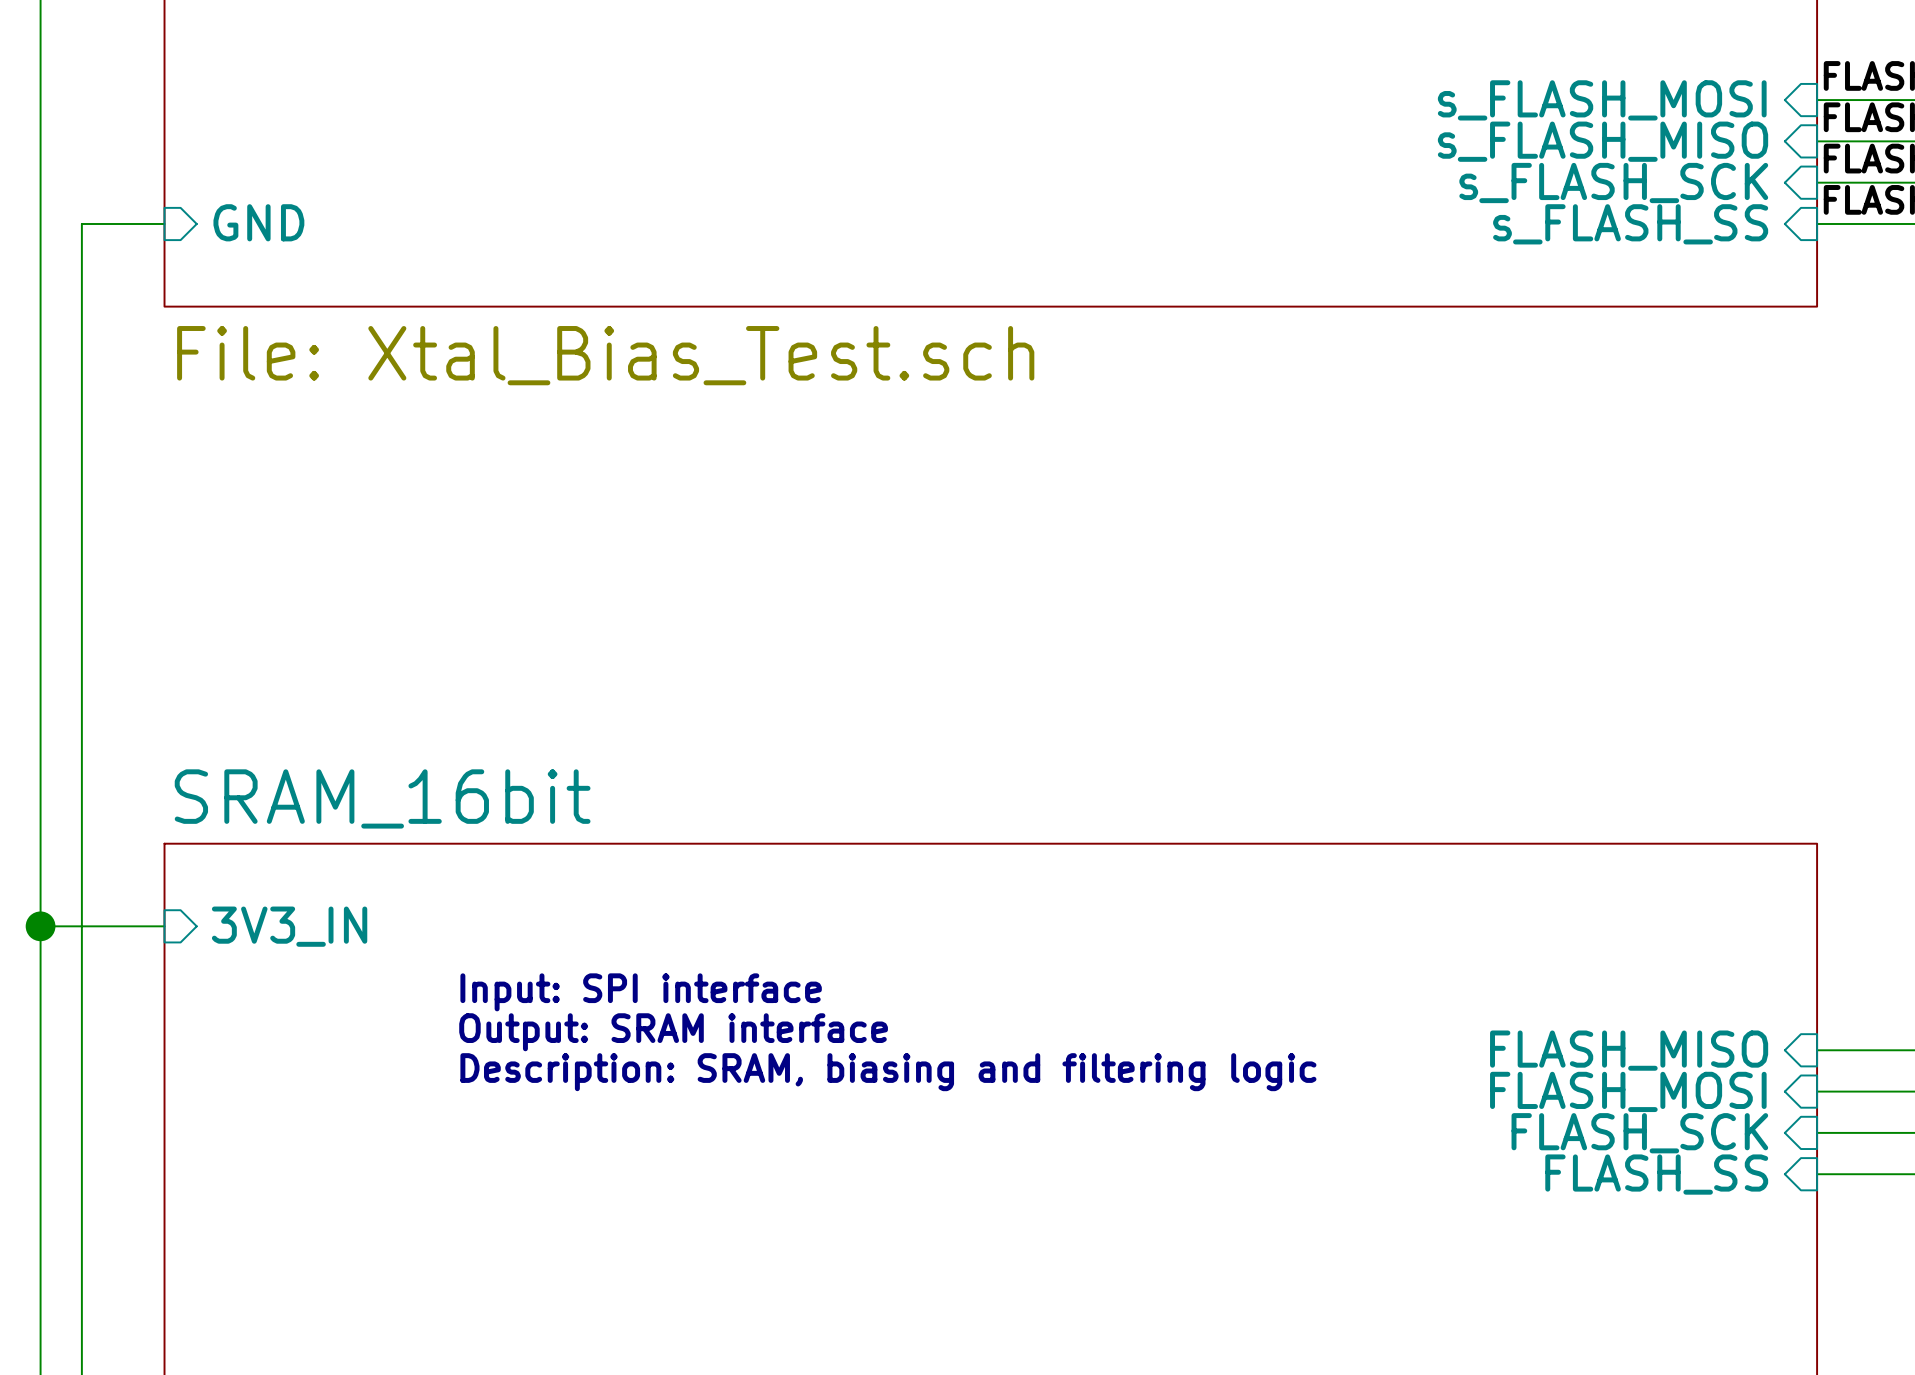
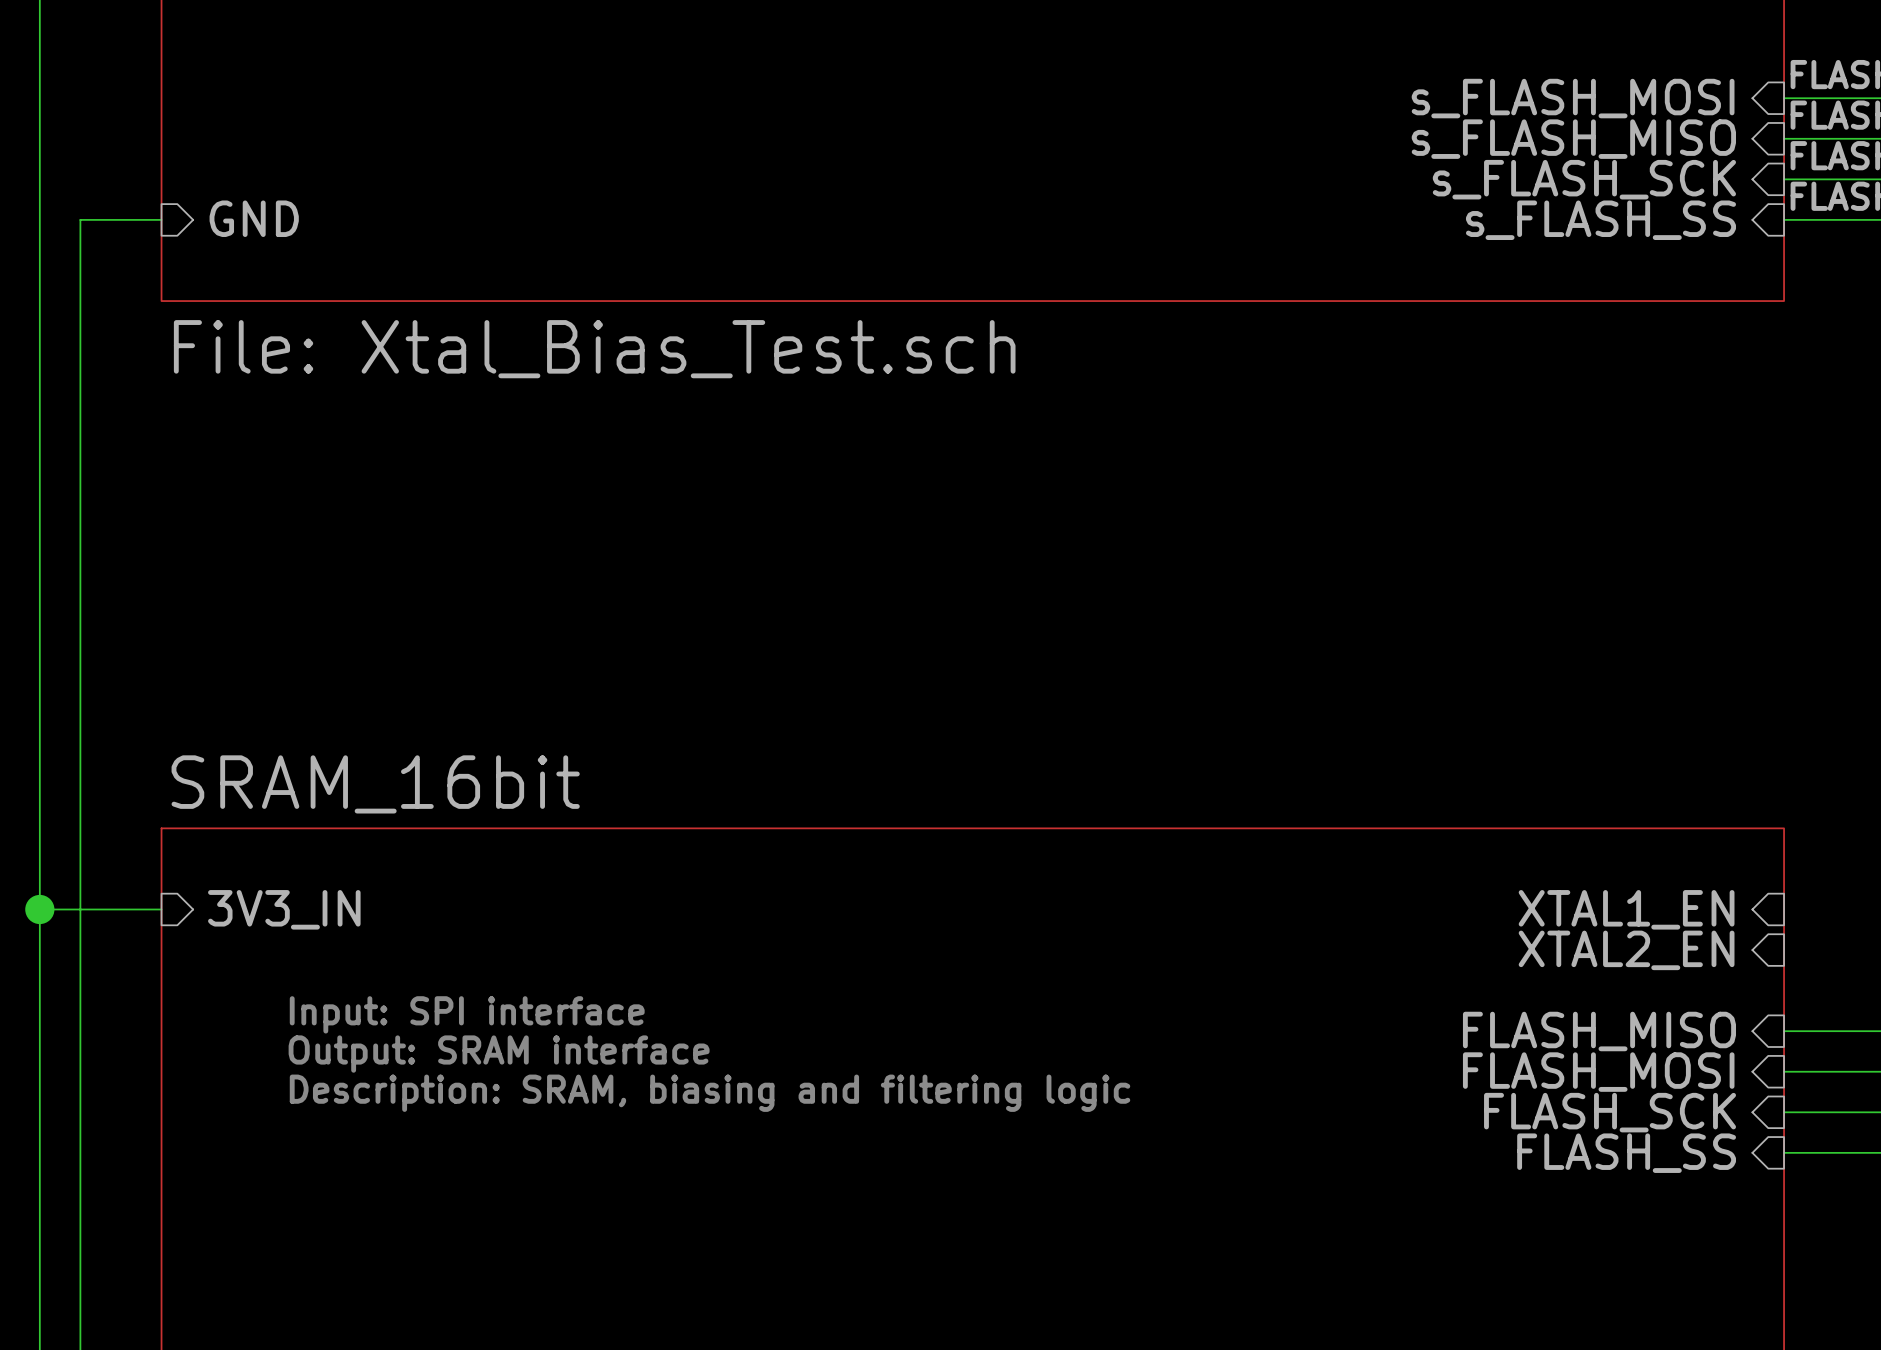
sheet pin: none -> XTAL1_EN (1626, 909)
sheet pin: none -> XTAL2_EN (1626, 950)
text position: Input: SPI interface (641, 992) -> Input: SPI interface (467, 1014)
text position: Output: SRAM interface (673, 1032) -> Output: SRAM interface (499, 1054)
text position: Description: SRAM, biasing and filtering logic (888, 1072) -> Description: SRAM, biasing and filtering logic (710, 1093)

